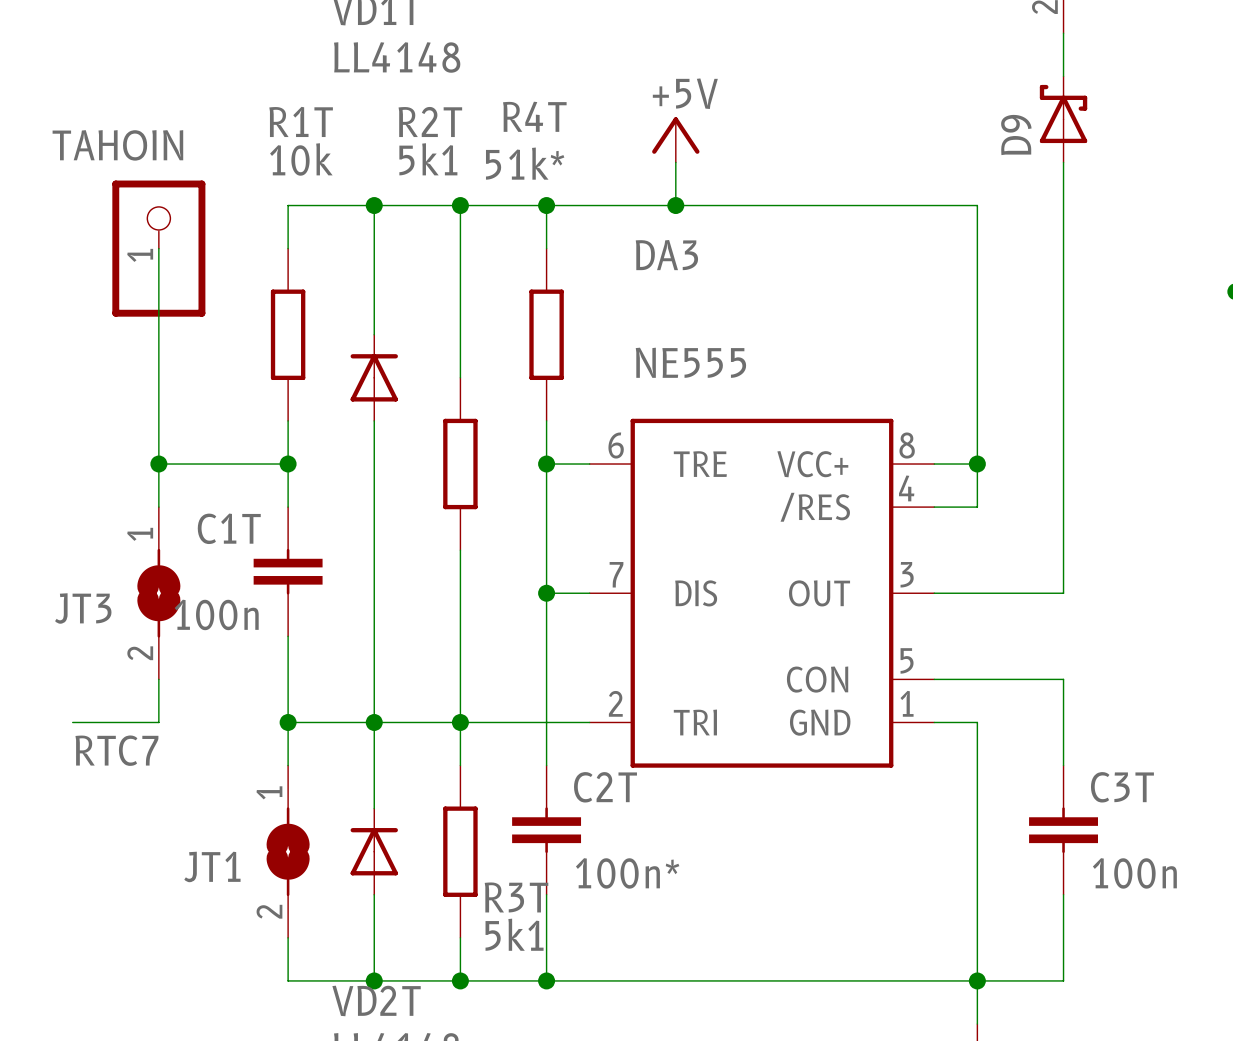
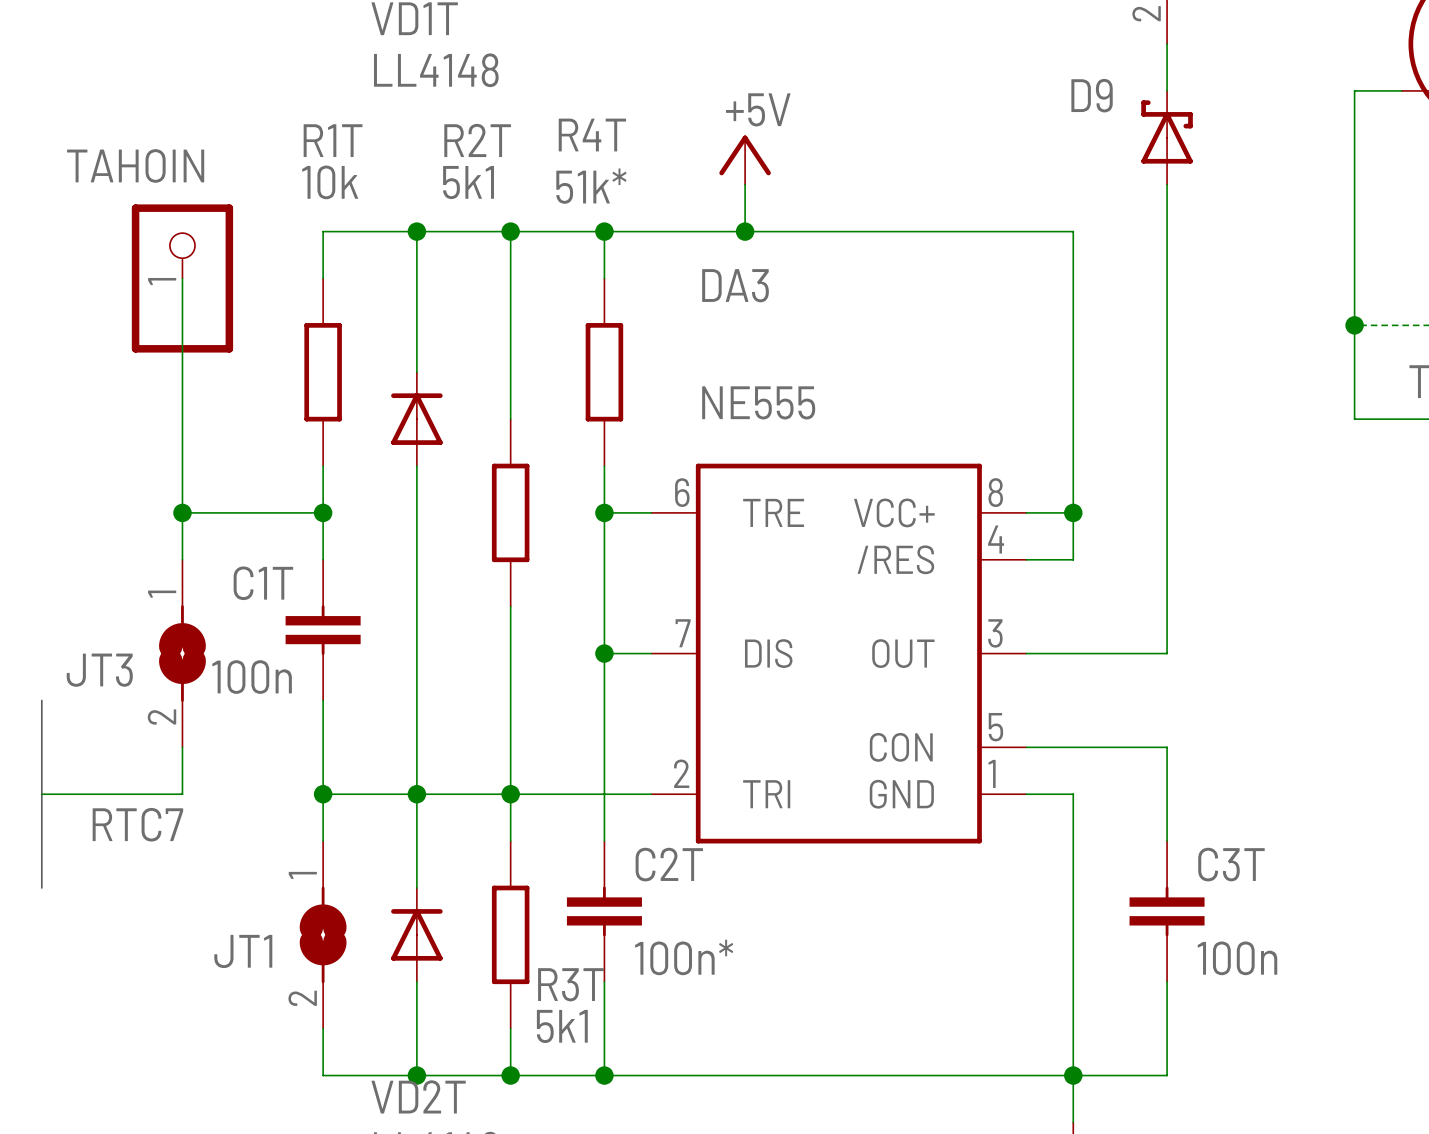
D9 name rotation: 0° (1016, 135) -> 90° clockwise (1092, 95)
bus: none -> (41, 700) (41, 887)
wire: none -> (41, 794) (88, 794)

